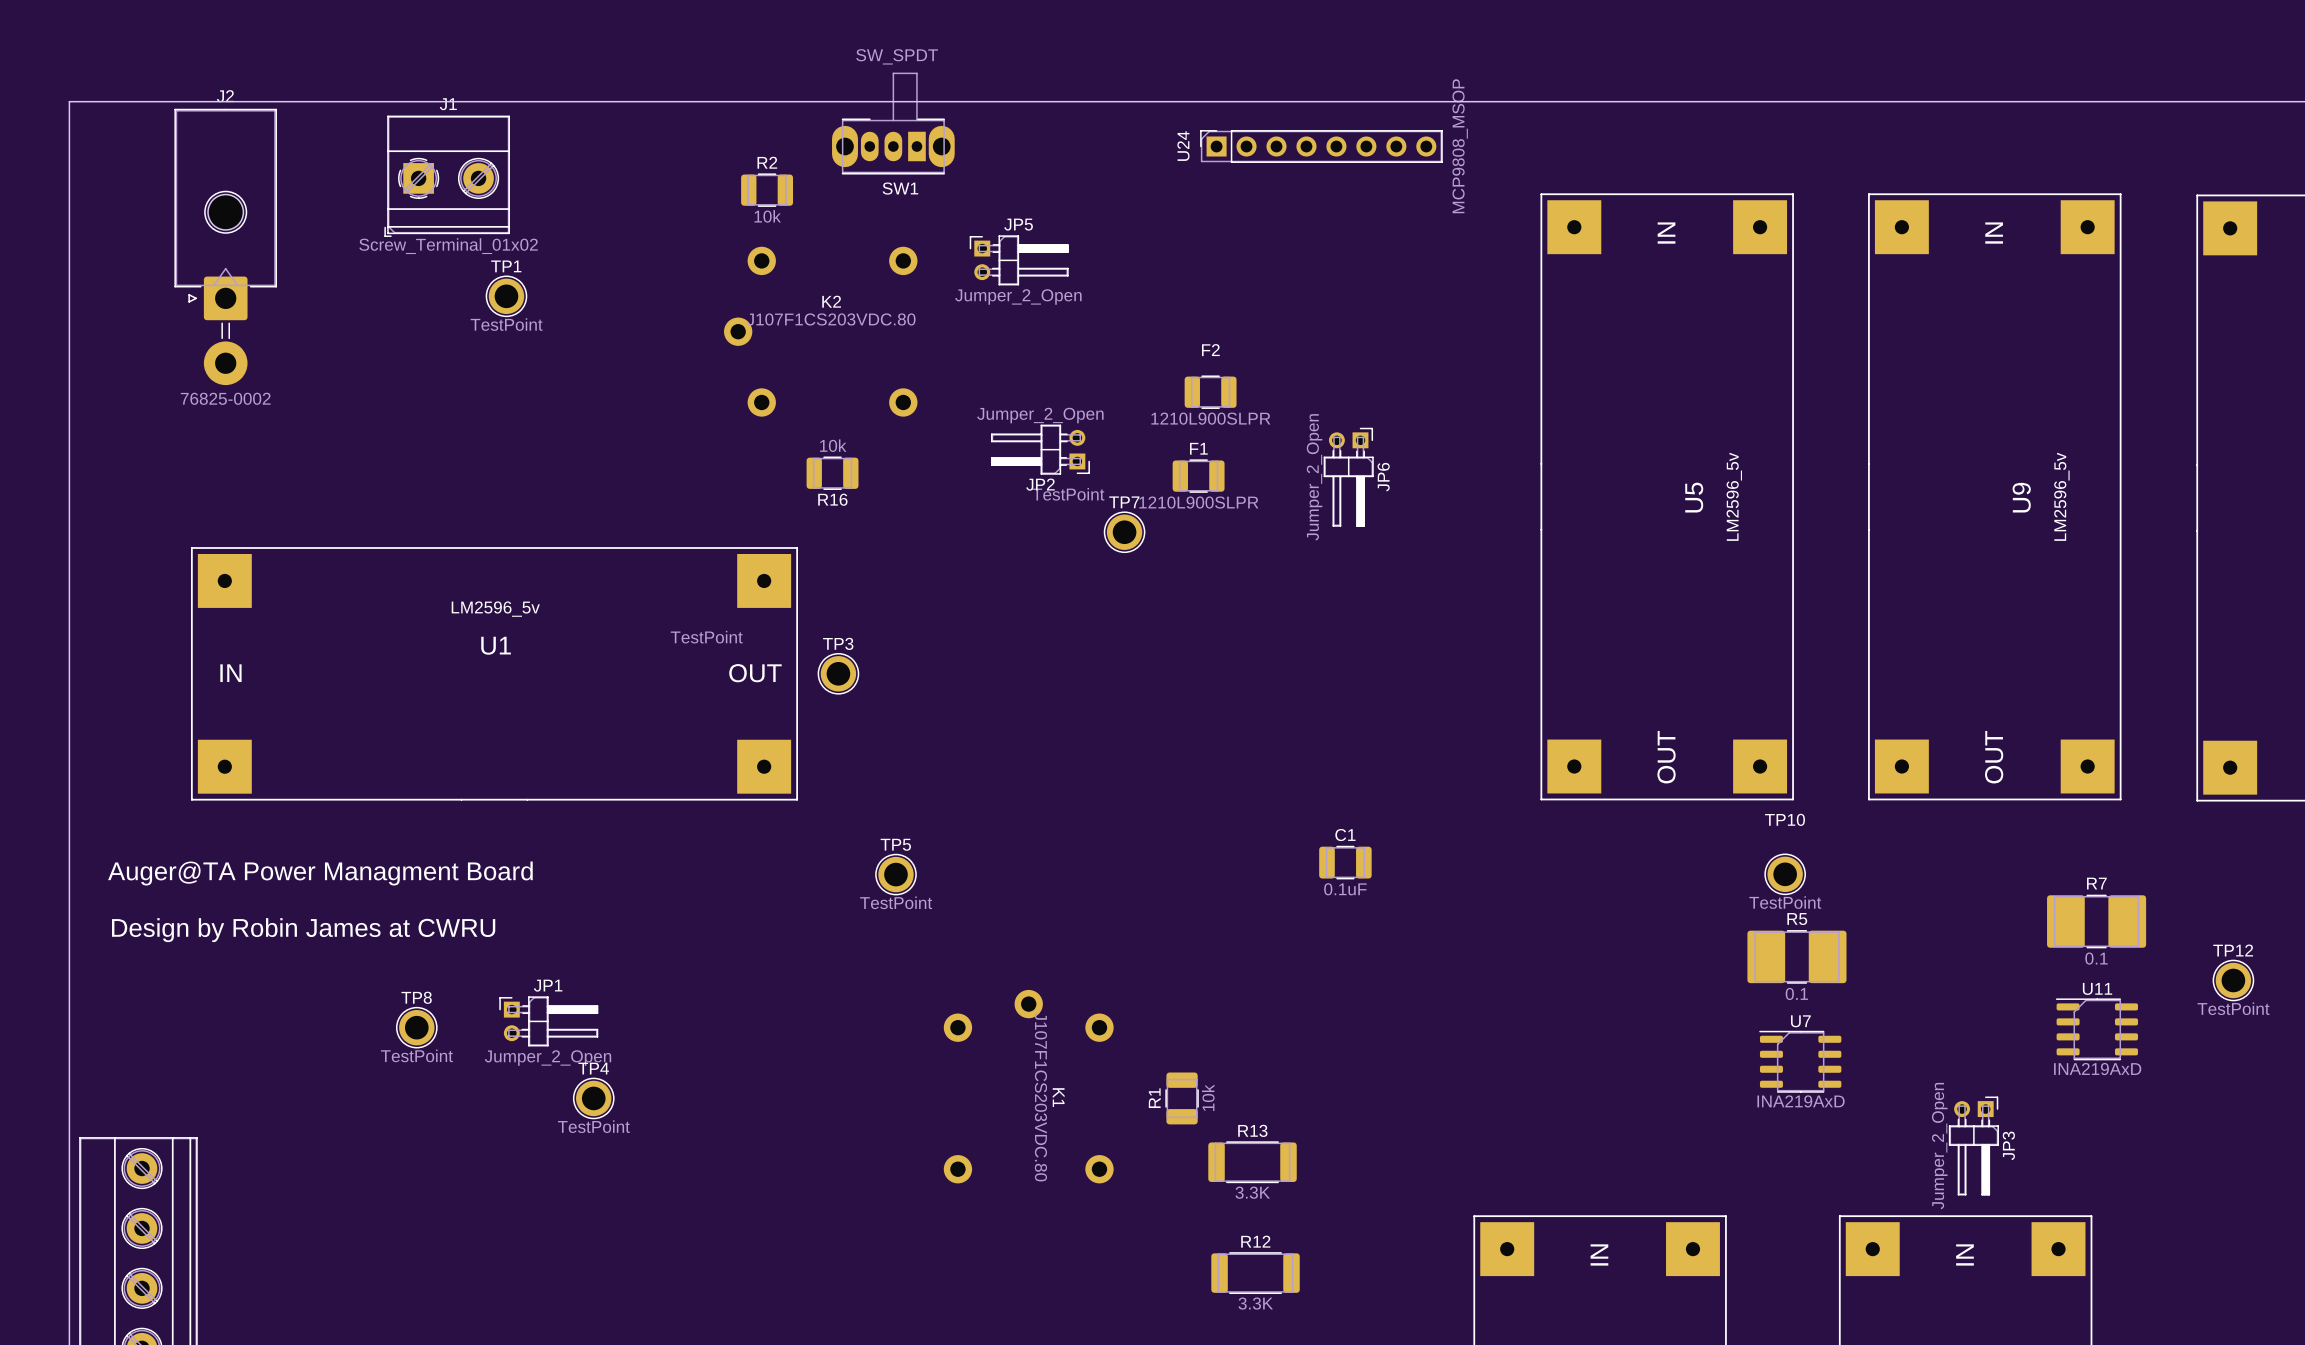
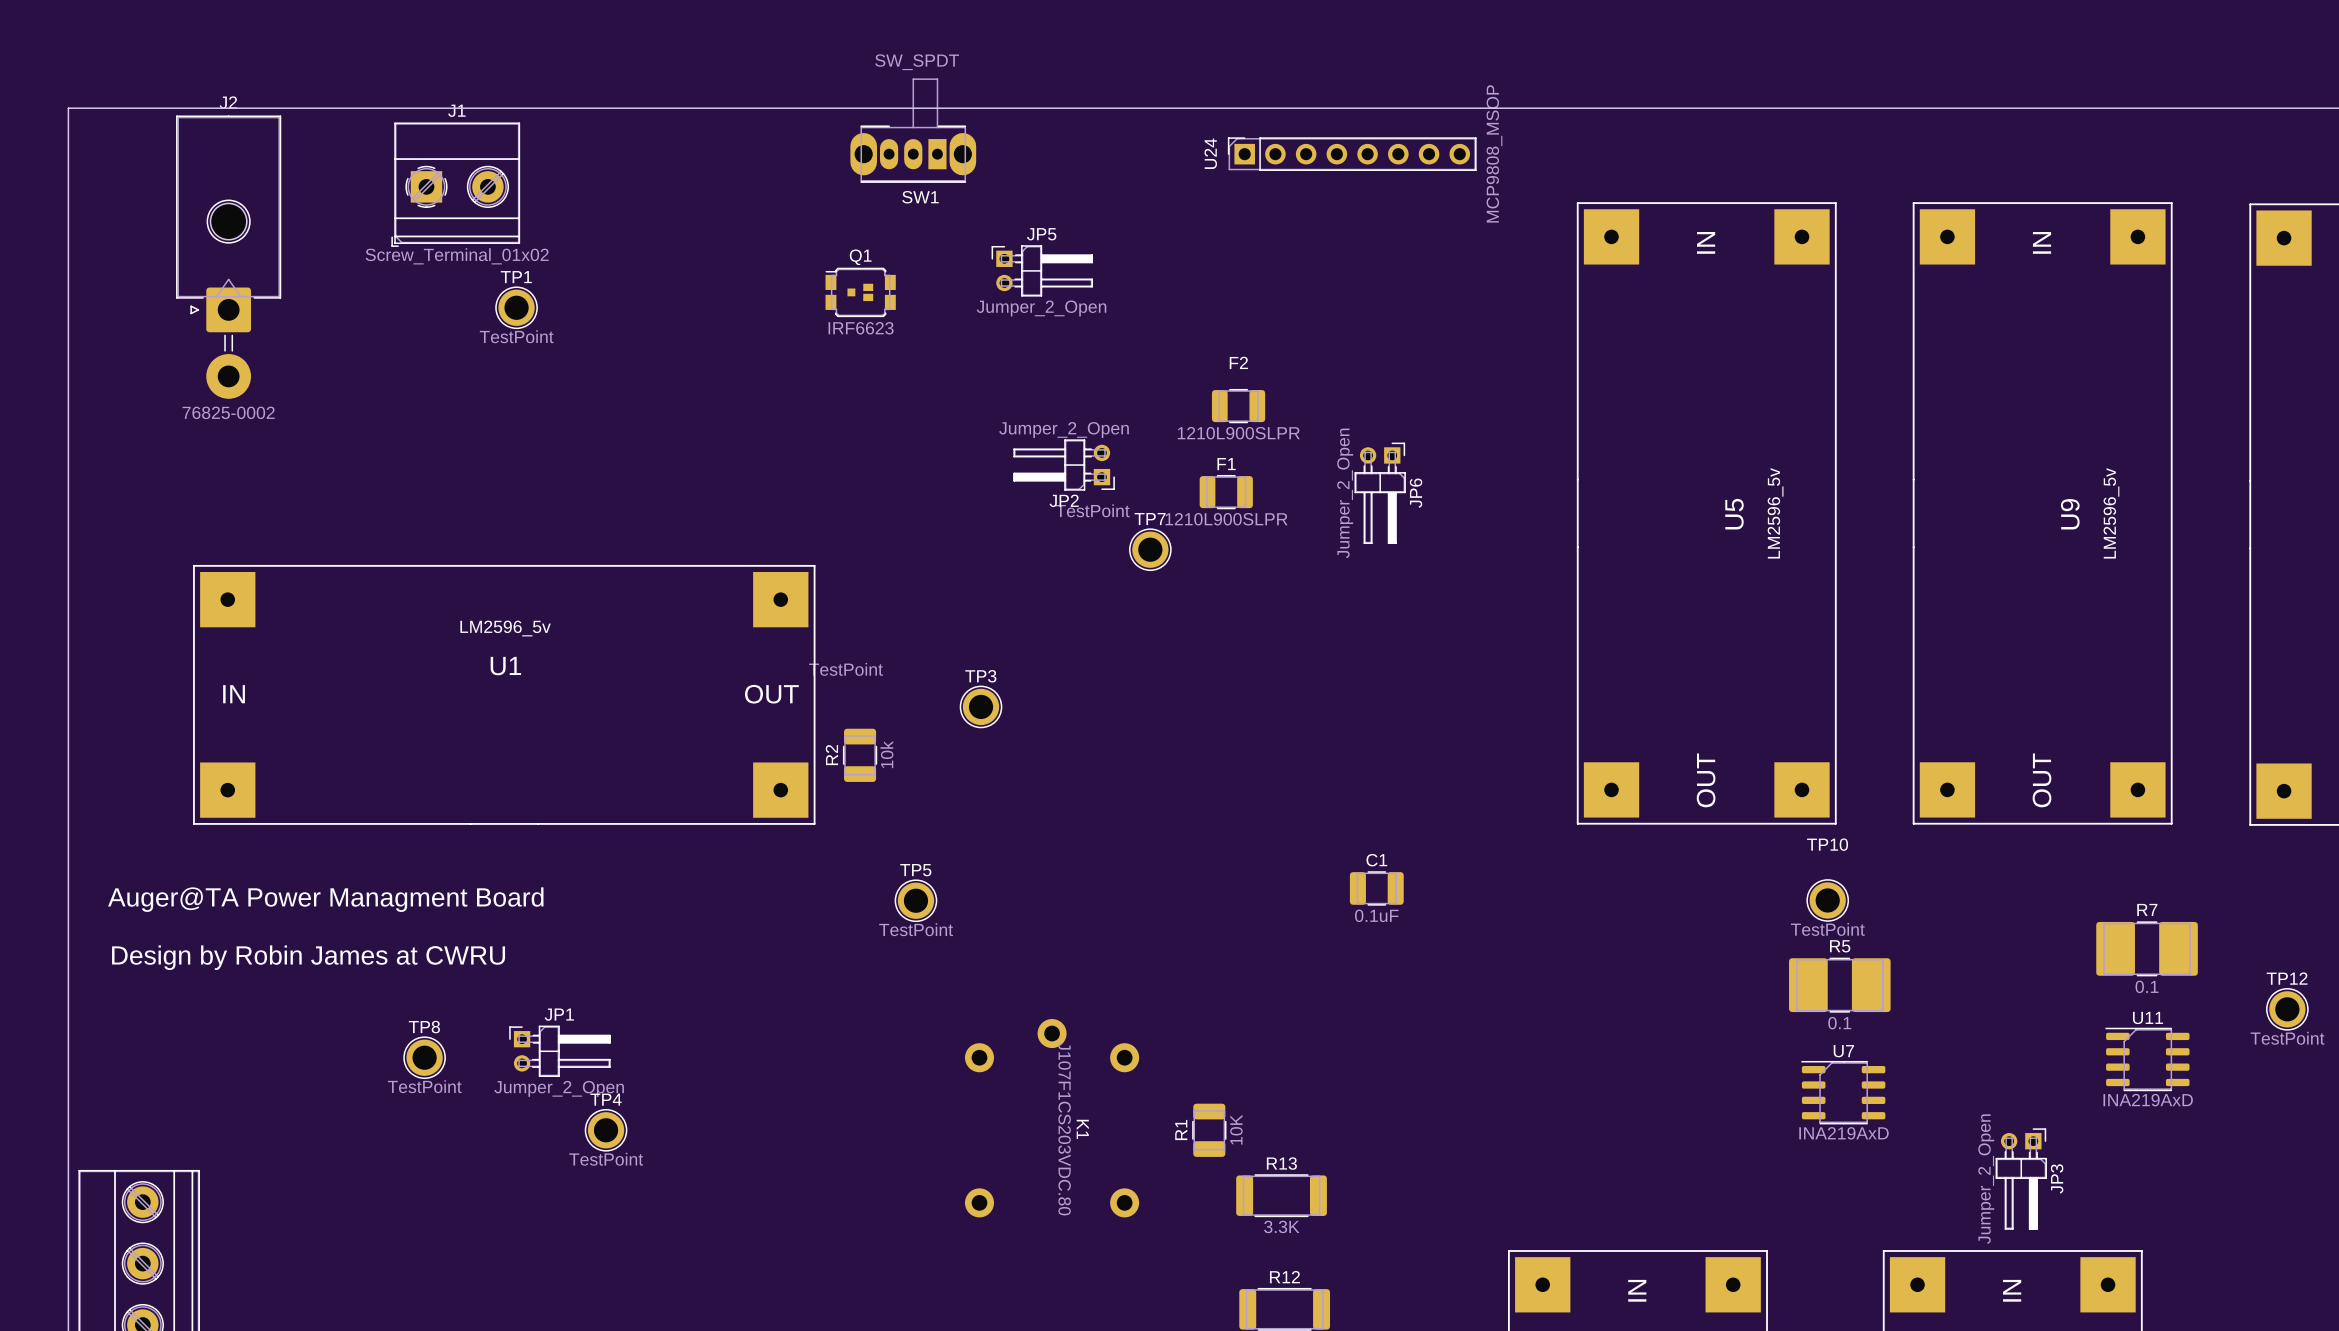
R2 name position: R2 (767, 162) -> R2 (831, 755)
R2 rotation: 0° (767, 190) -> 90° clockwise (860, 755)
R2 position: (767, 190) -> (860, 755)
R2 value position: 10k (767, 216) -> 10k (886, 754)
Q1: none -> IRF6623 (860, 292)
K2: J107F1CS203VDC.80 (820, 331) -> none
R16: 10k (832, 473) -> none
TP3 position: (838, 673) -> (981, 706)
R1 value: 10k (1208, 1097) -> 10K (1236, 1129)

